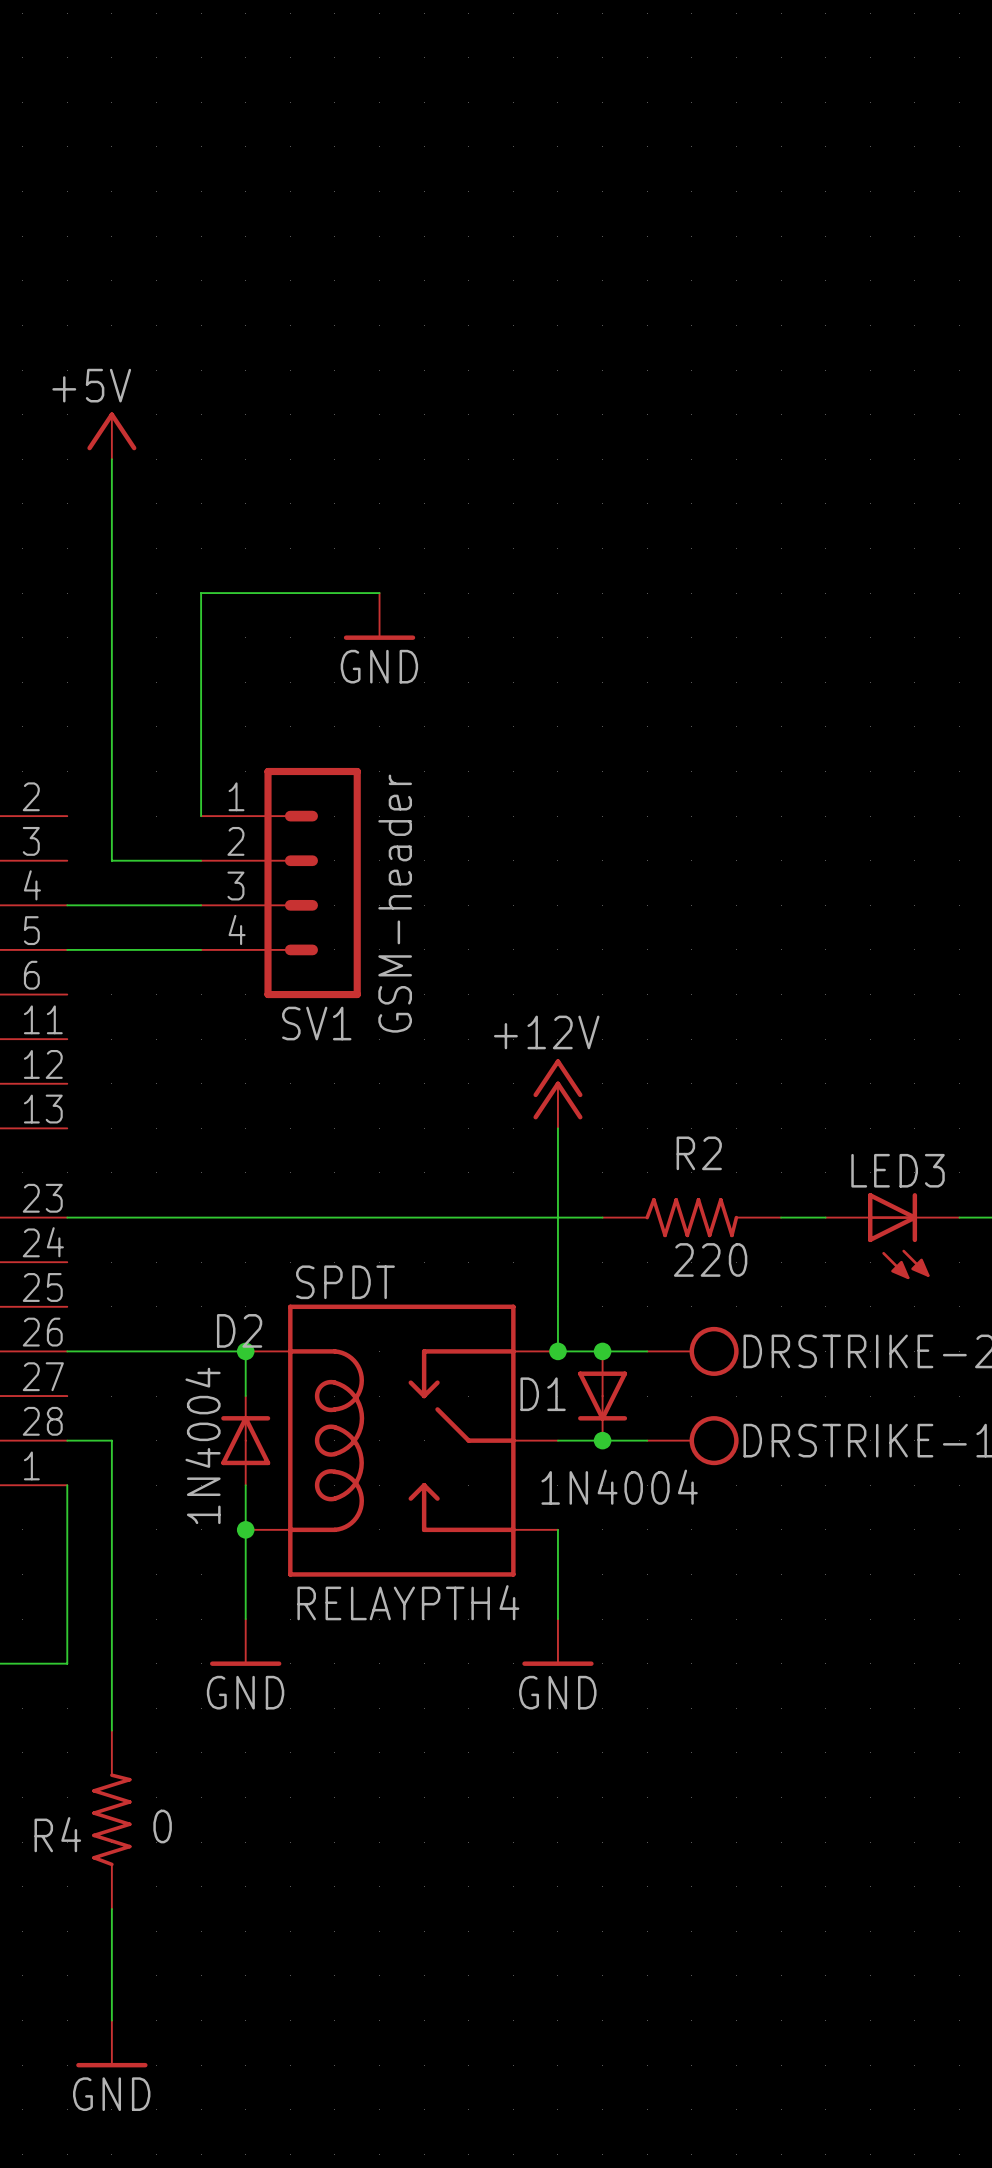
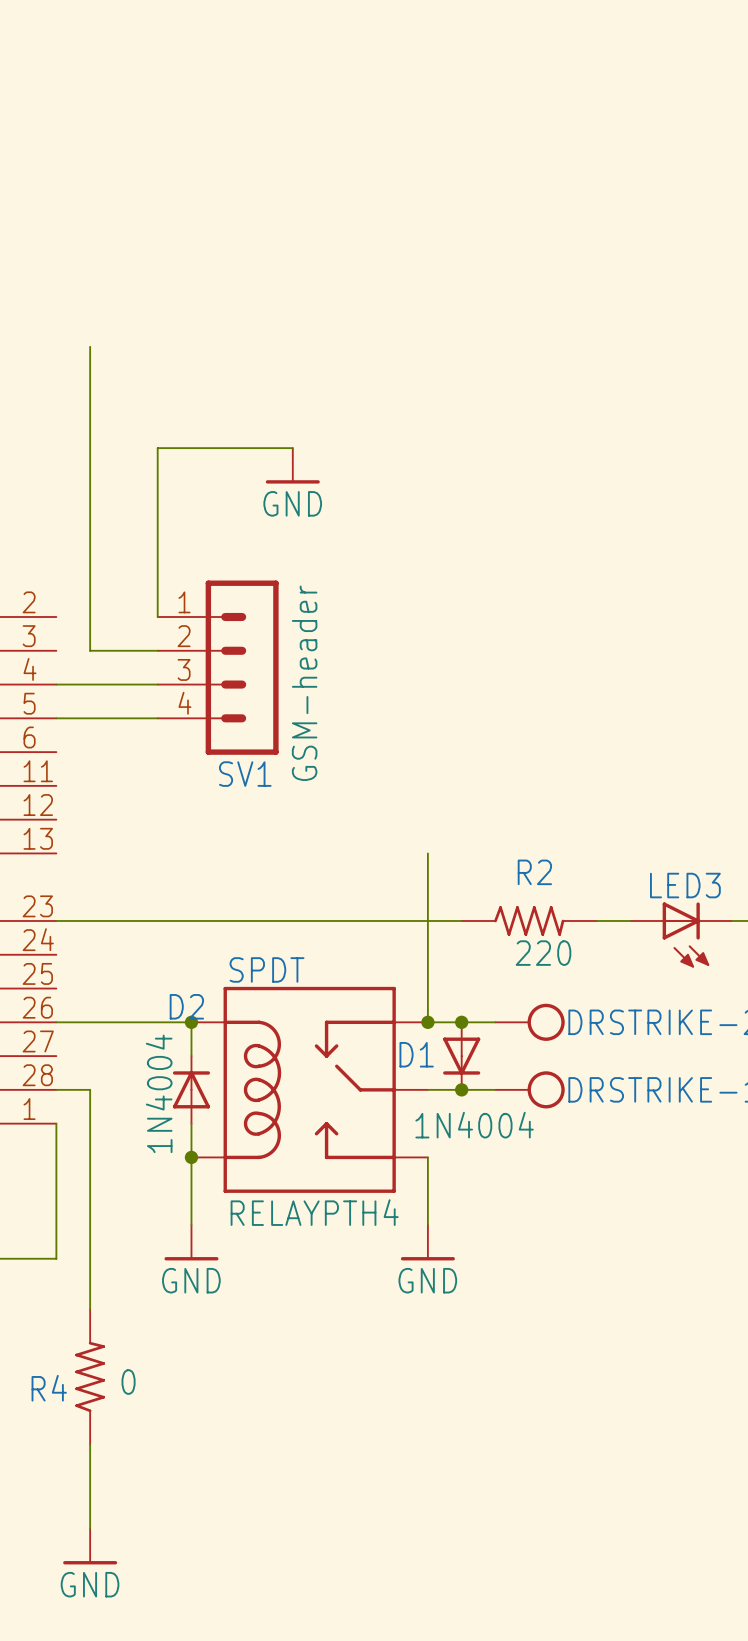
power symbol: +5V (111, 435) -> none
power symbol: +12V (557, 1093) -> none

